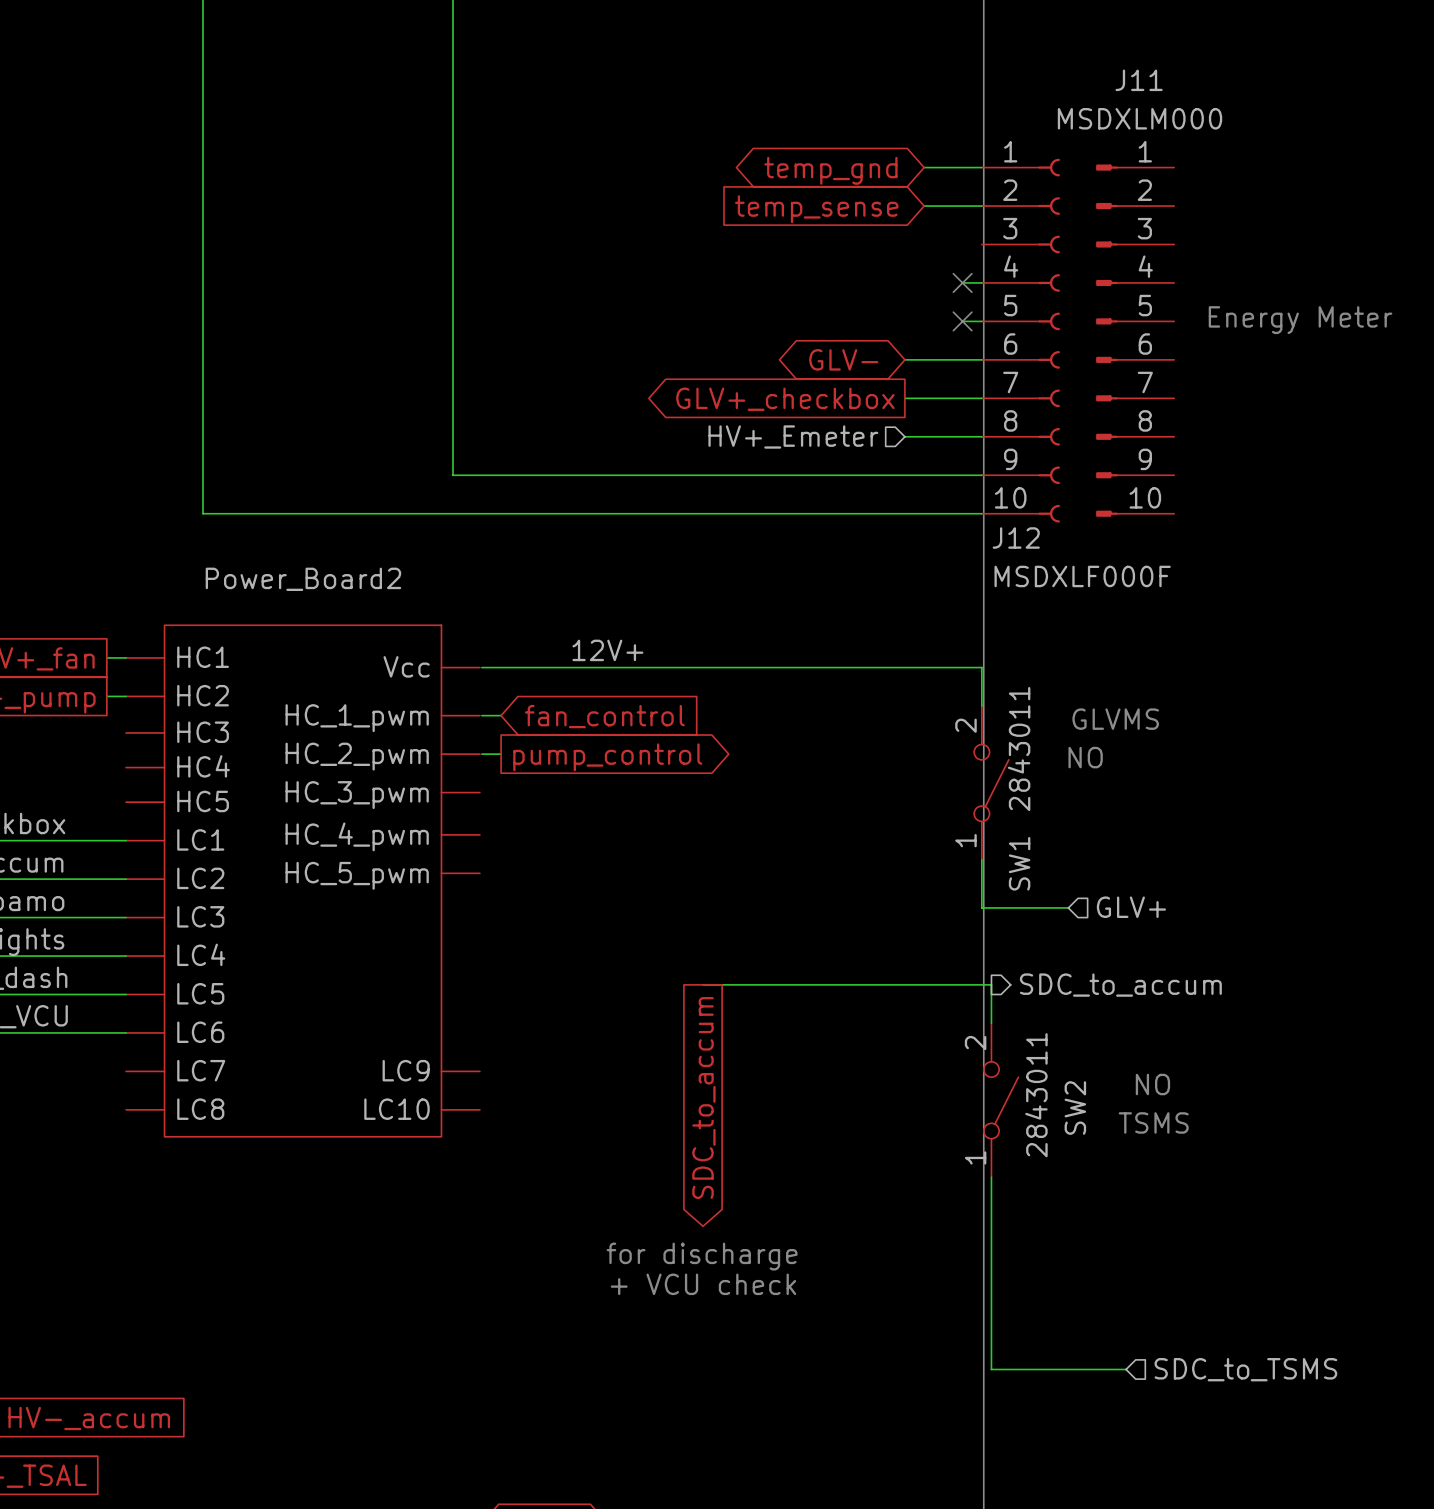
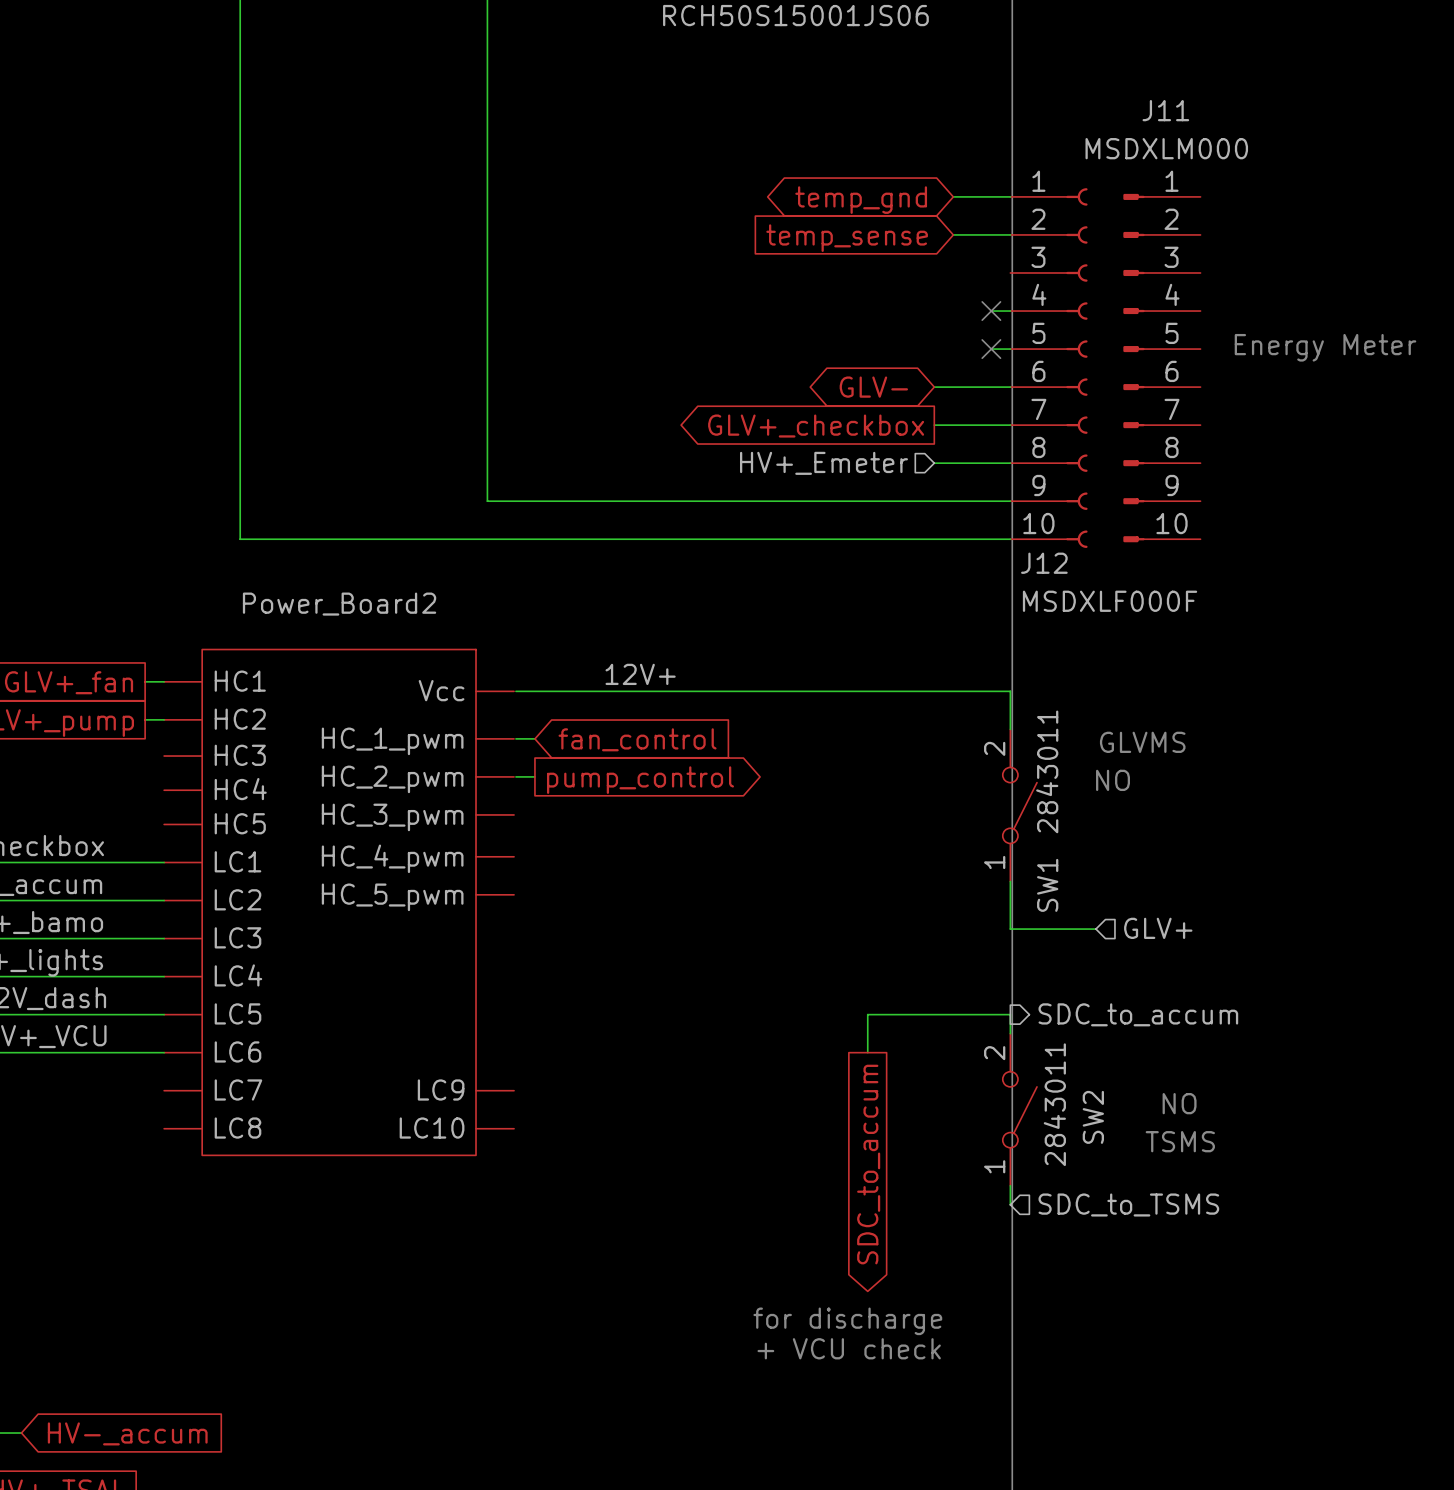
wire: (703, 984) (991, 984) (991, 1023) -> none
hierarchical label position: SDC_to_accum (1120, 985) -> SDC_to_accum (1138, 1014)
wire: none -> (1010, 1033) (1010, 1014) (867, 1014) (867, 1052)
global label position: SDC_to_accum (703, 1098) -> SDC_to_accum (868, 1164)
SW2 position: (1001, 1100) -> (1019, 1109)
wire: none -> (1010, 1185) (1010, 1204)
wire: (991, 1177) (991, 1369) (1126, 1369) -> none
text position: for discharge (702, 1256) -> for discharge (847, 1321)
text position: + VCU check (703, 1284) -> + VCU check (849, 1348)
hierarchical label position: SDC_to_TSMS (1245, 1369) -> SDC_to_TSMS (1128, 1205)

